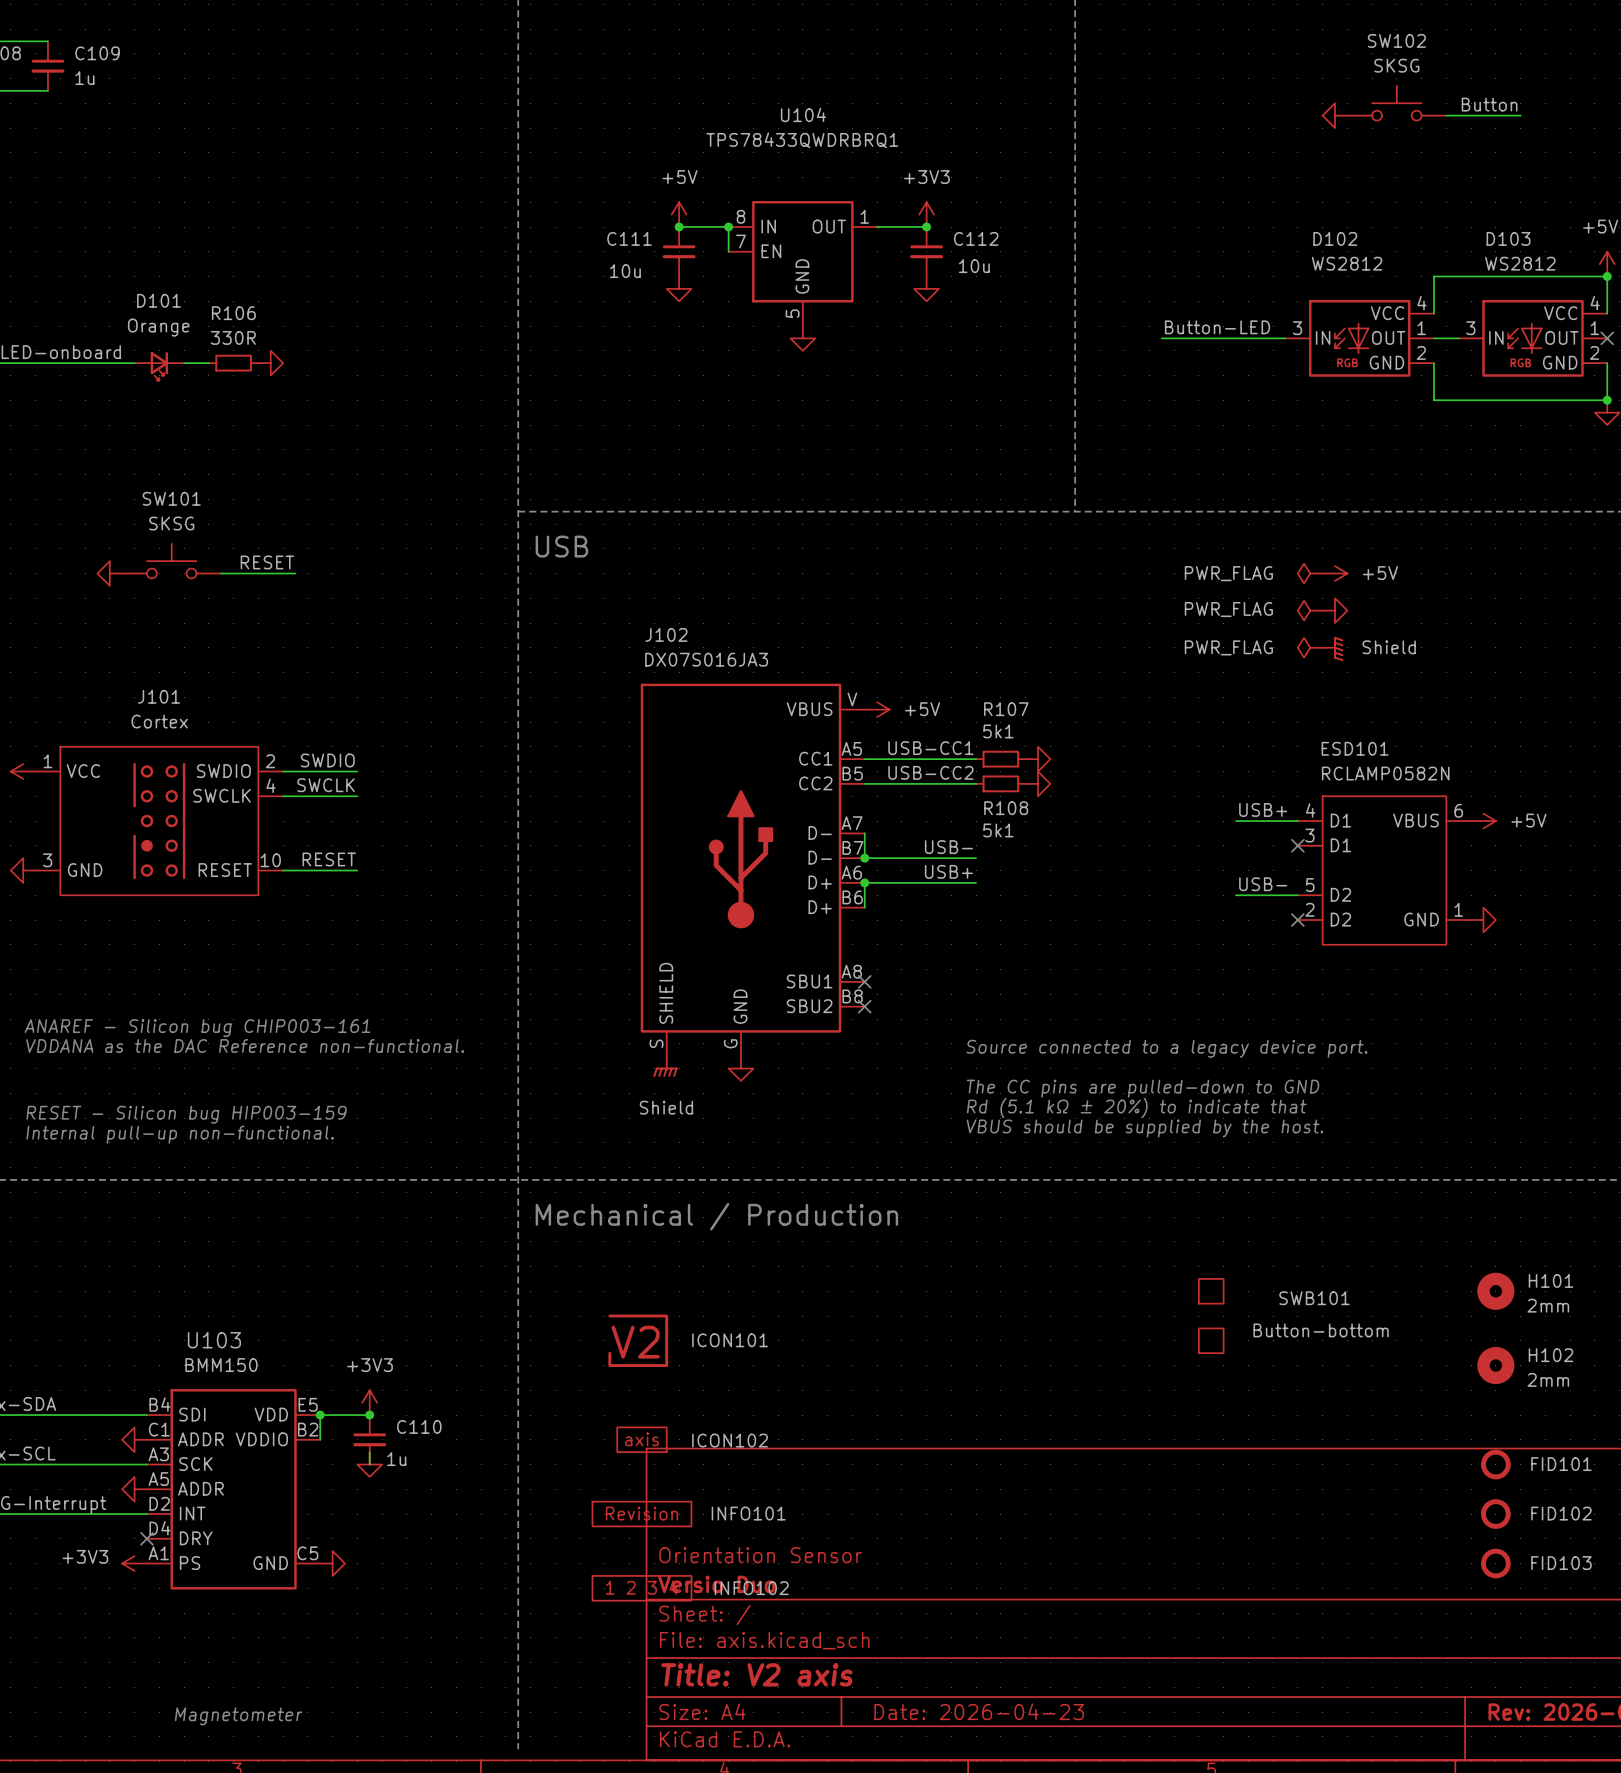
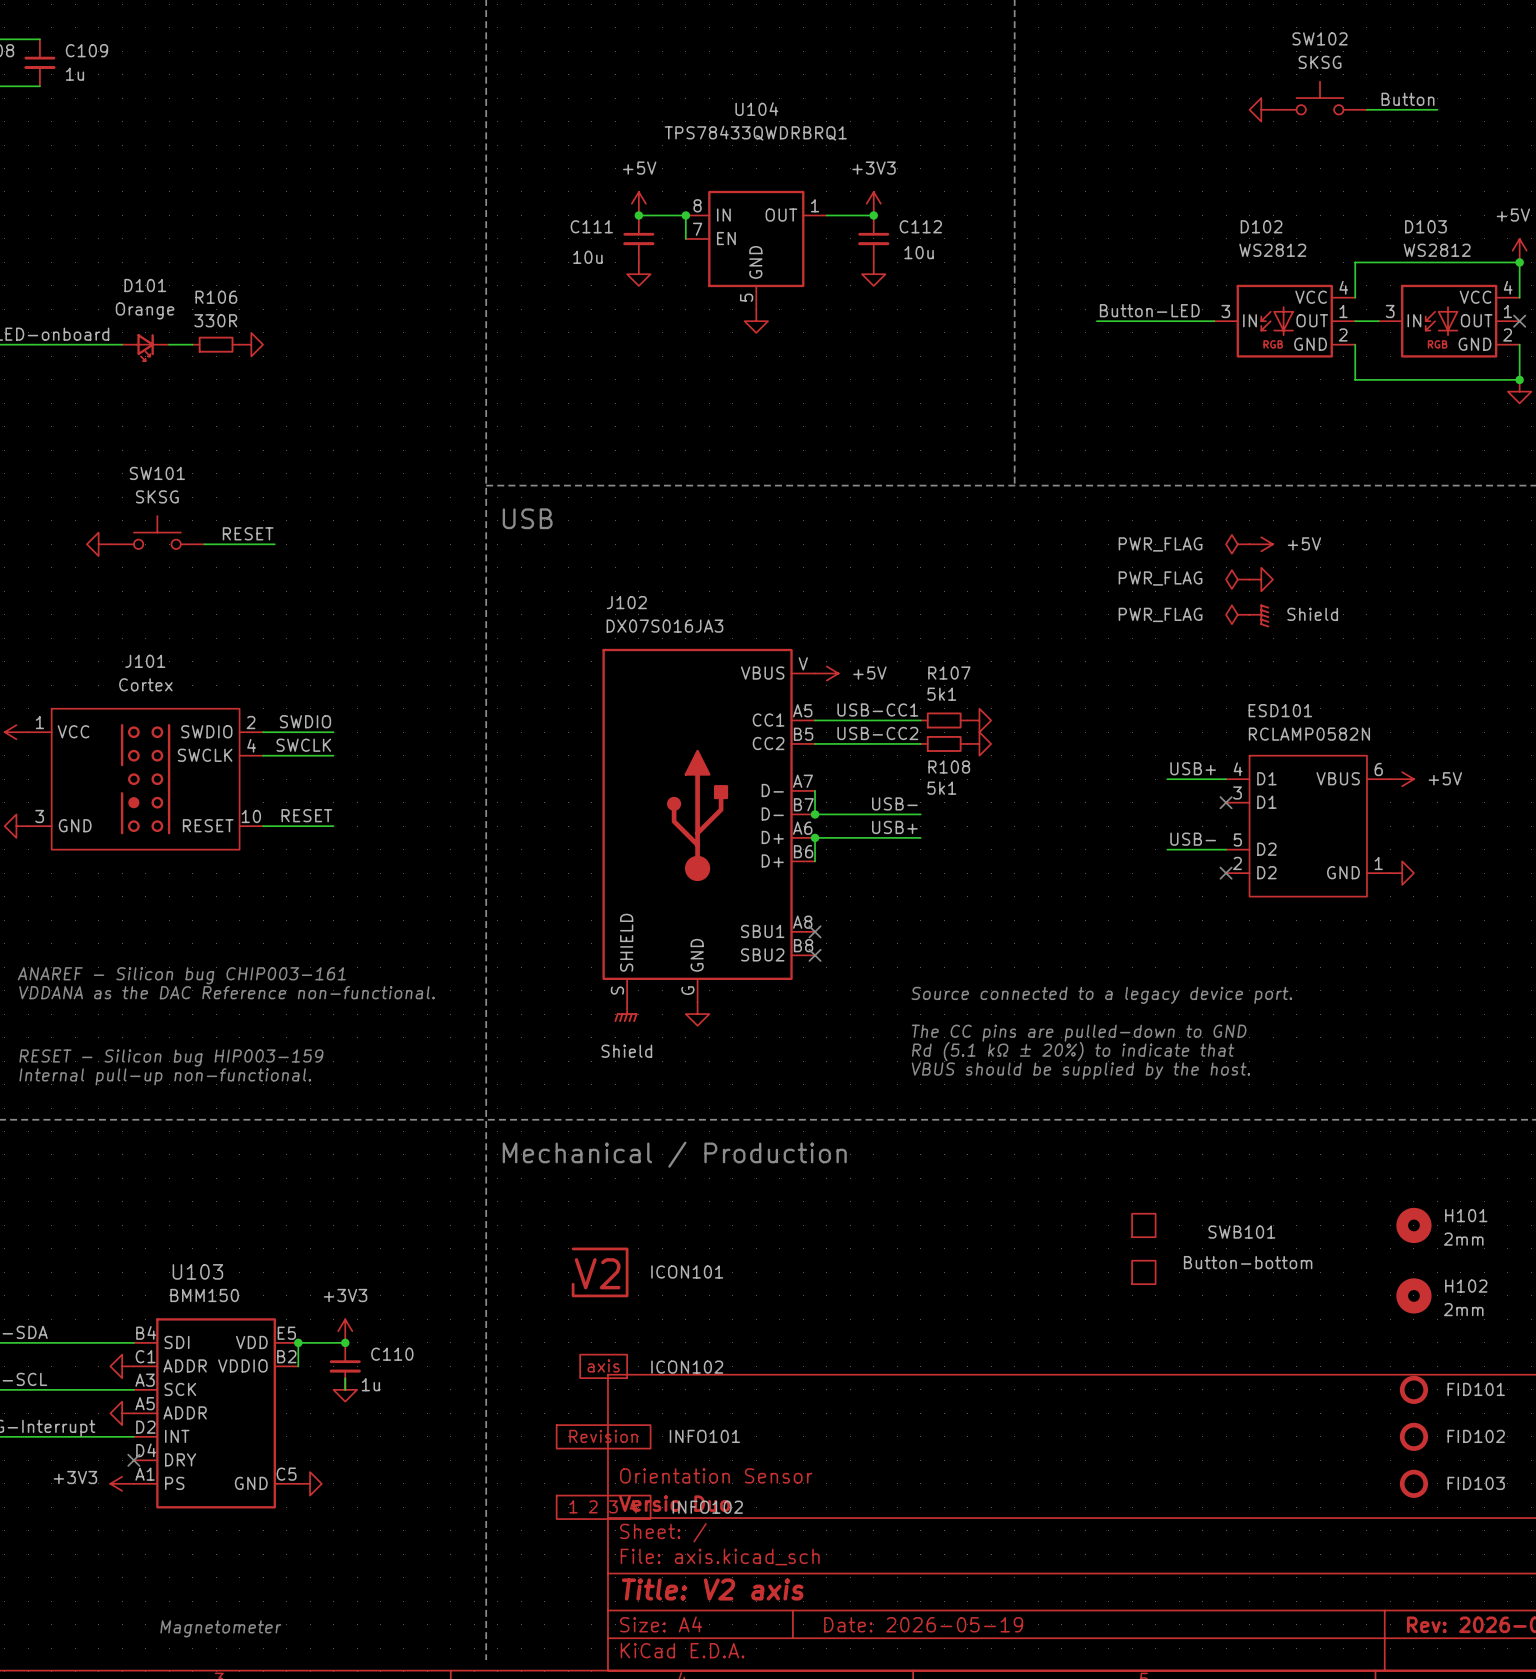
title block: Date: 2026-04-23 (979, 1711) -> Date: 2026-05-19 (923, 1624)

